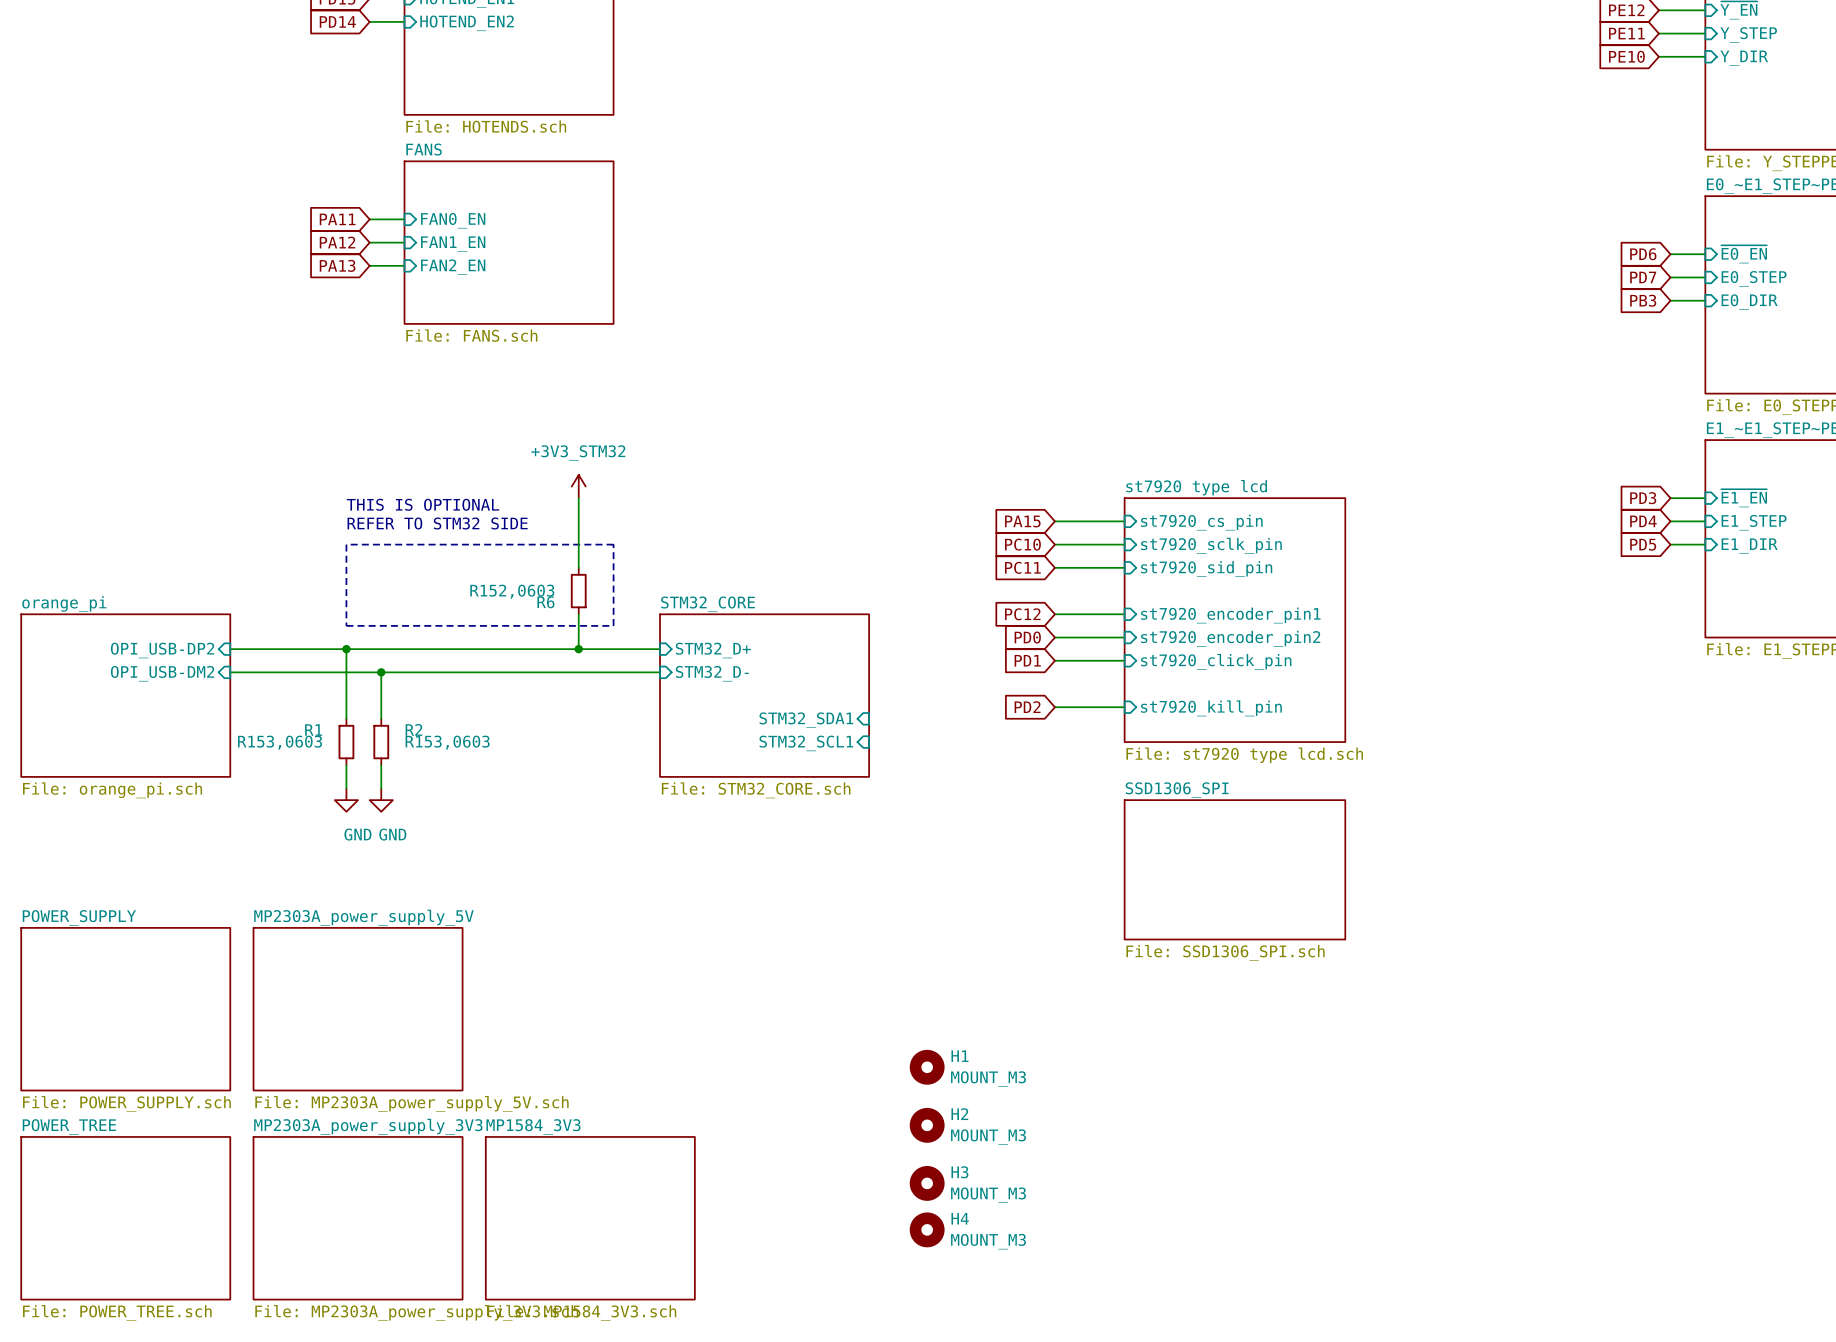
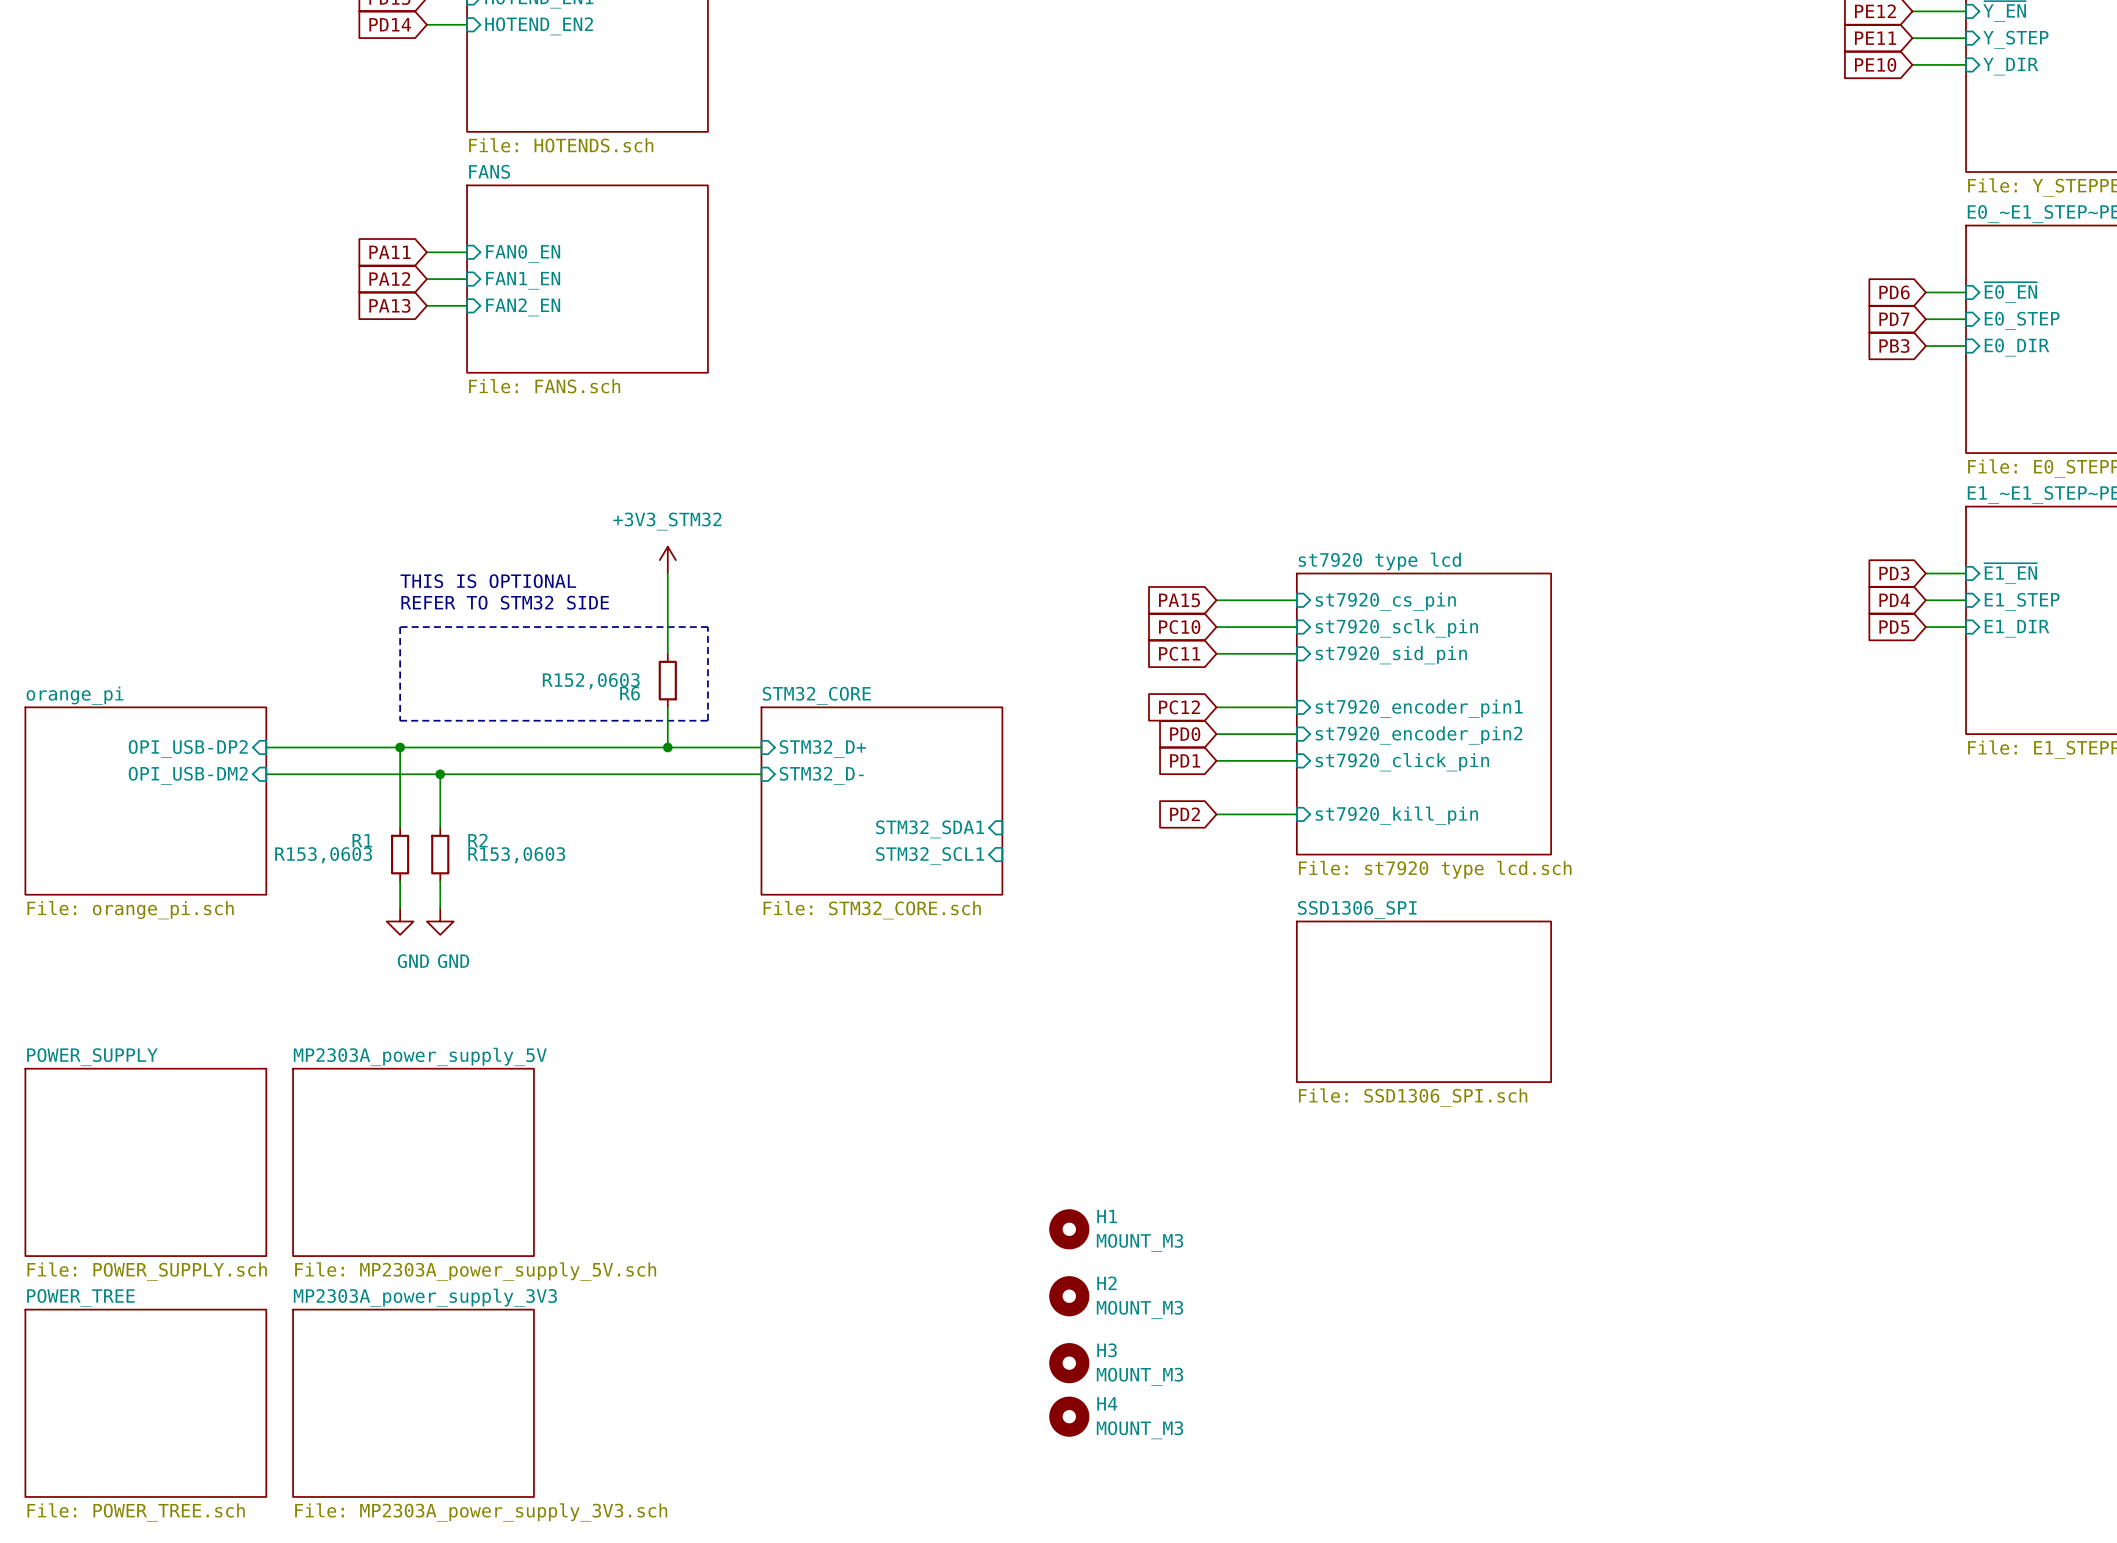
sheet MP1584_3V3: File: MP1584_3V3.sch (590, 1218) -> none

